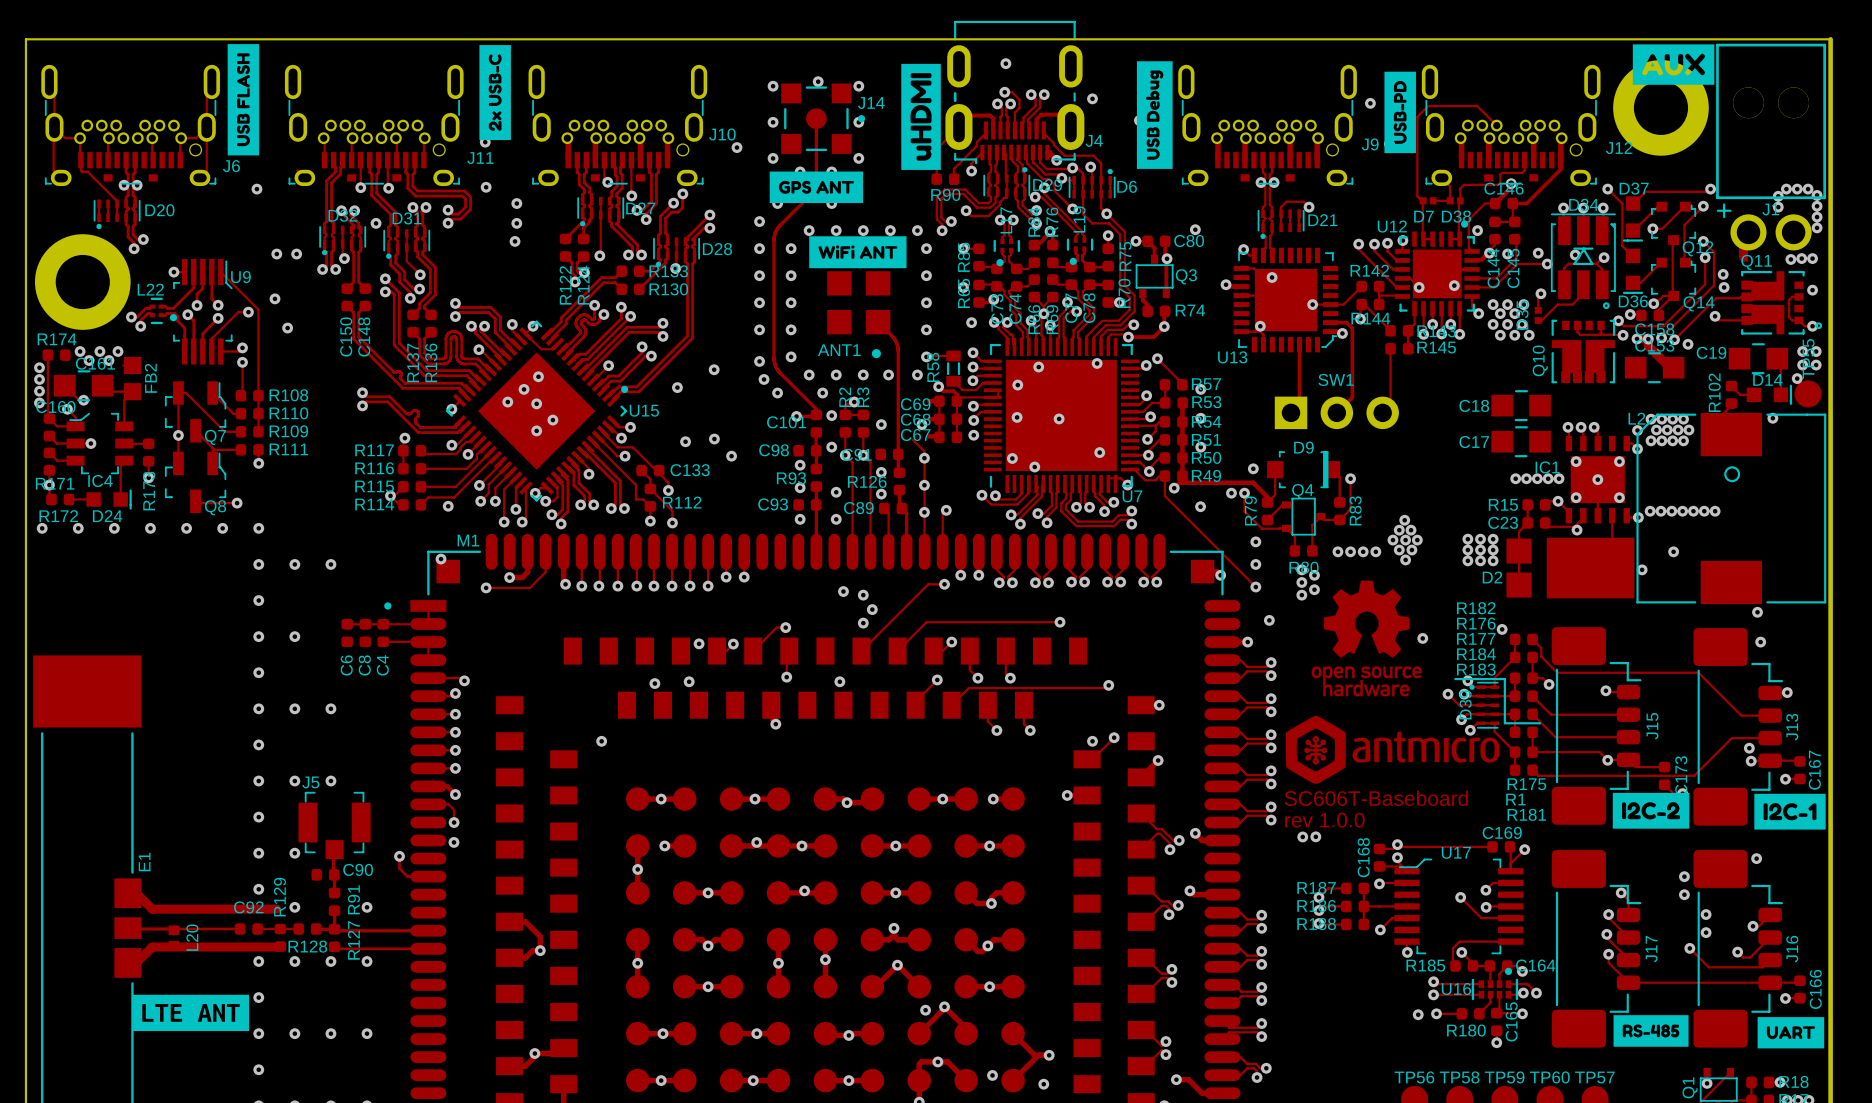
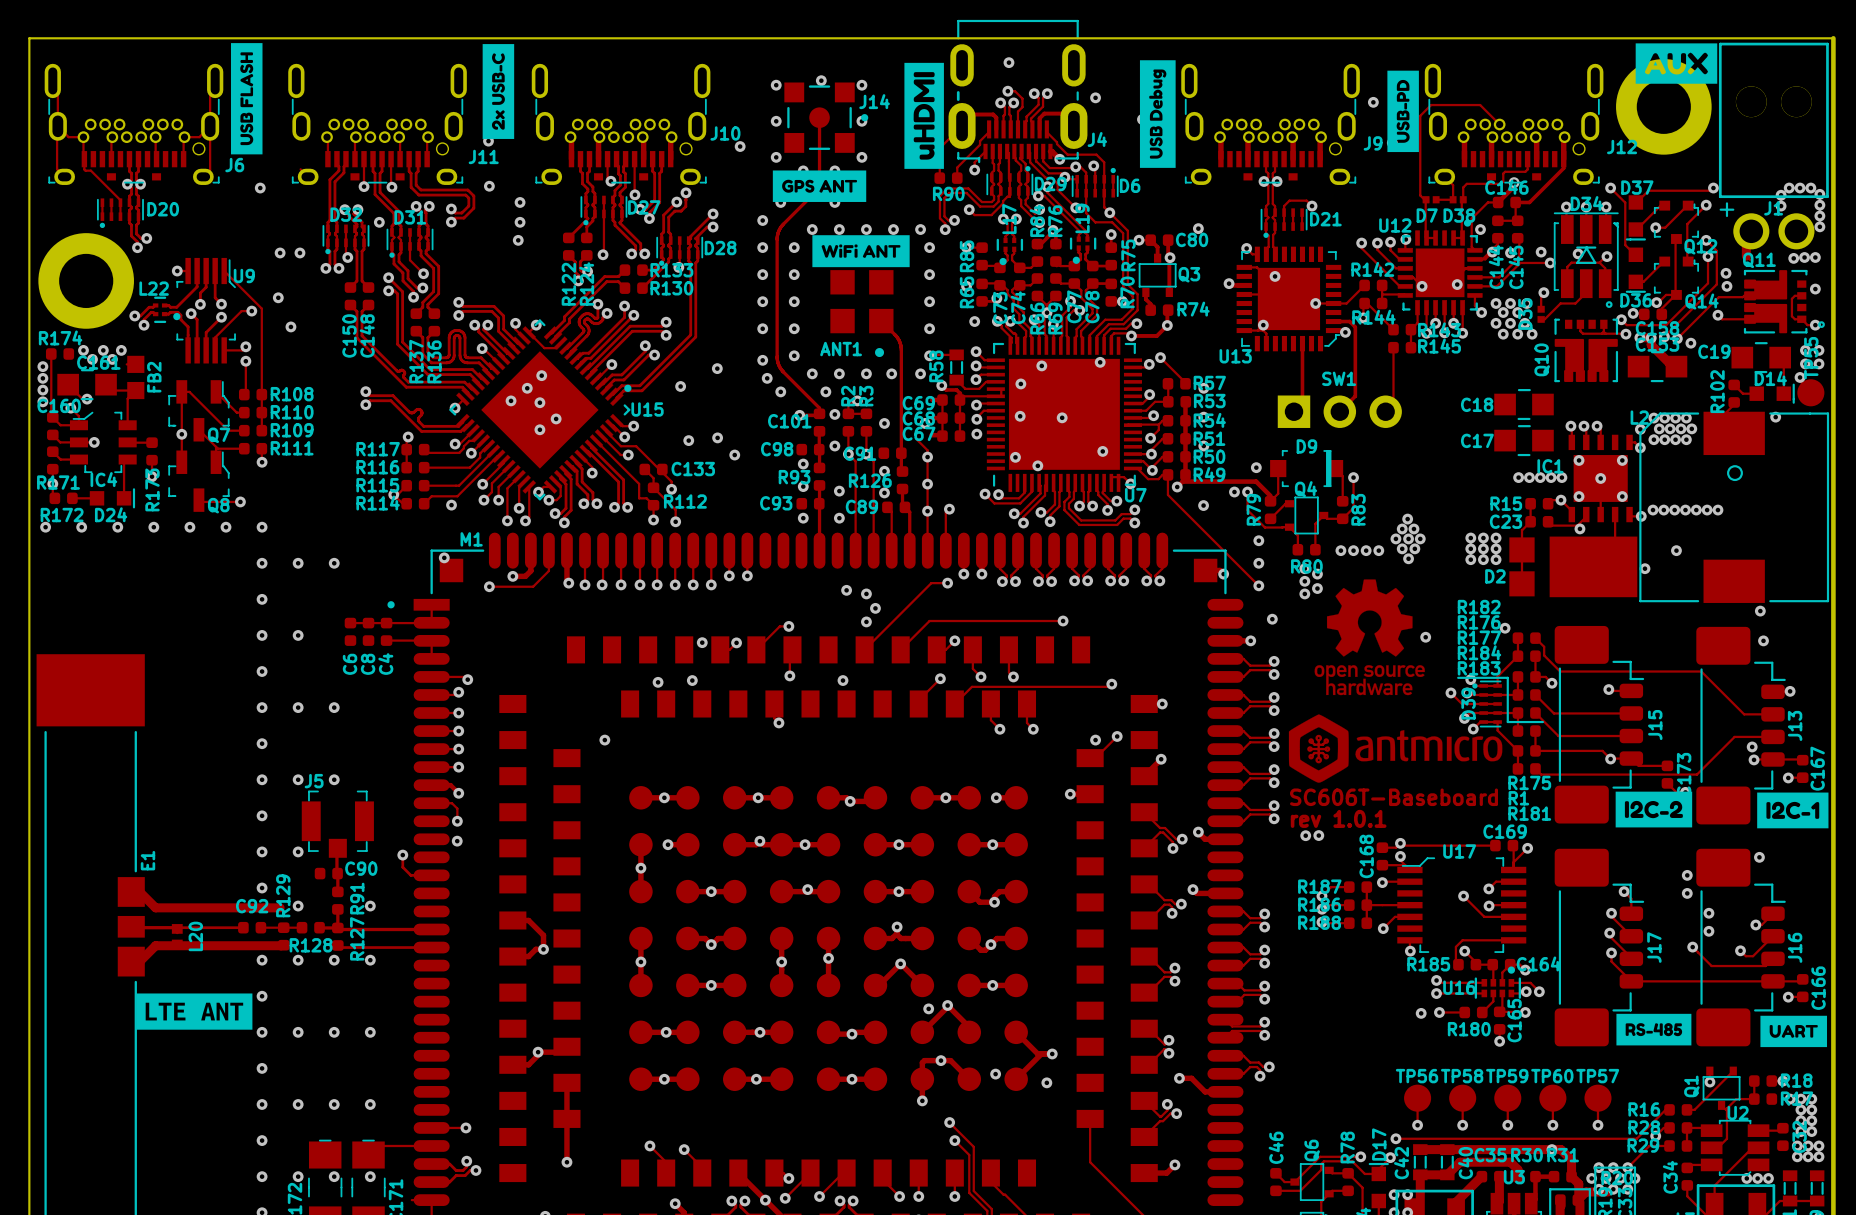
text: rev 1.0.0 (1324, 820) -> rev 1.0.1 (1338, 818)

